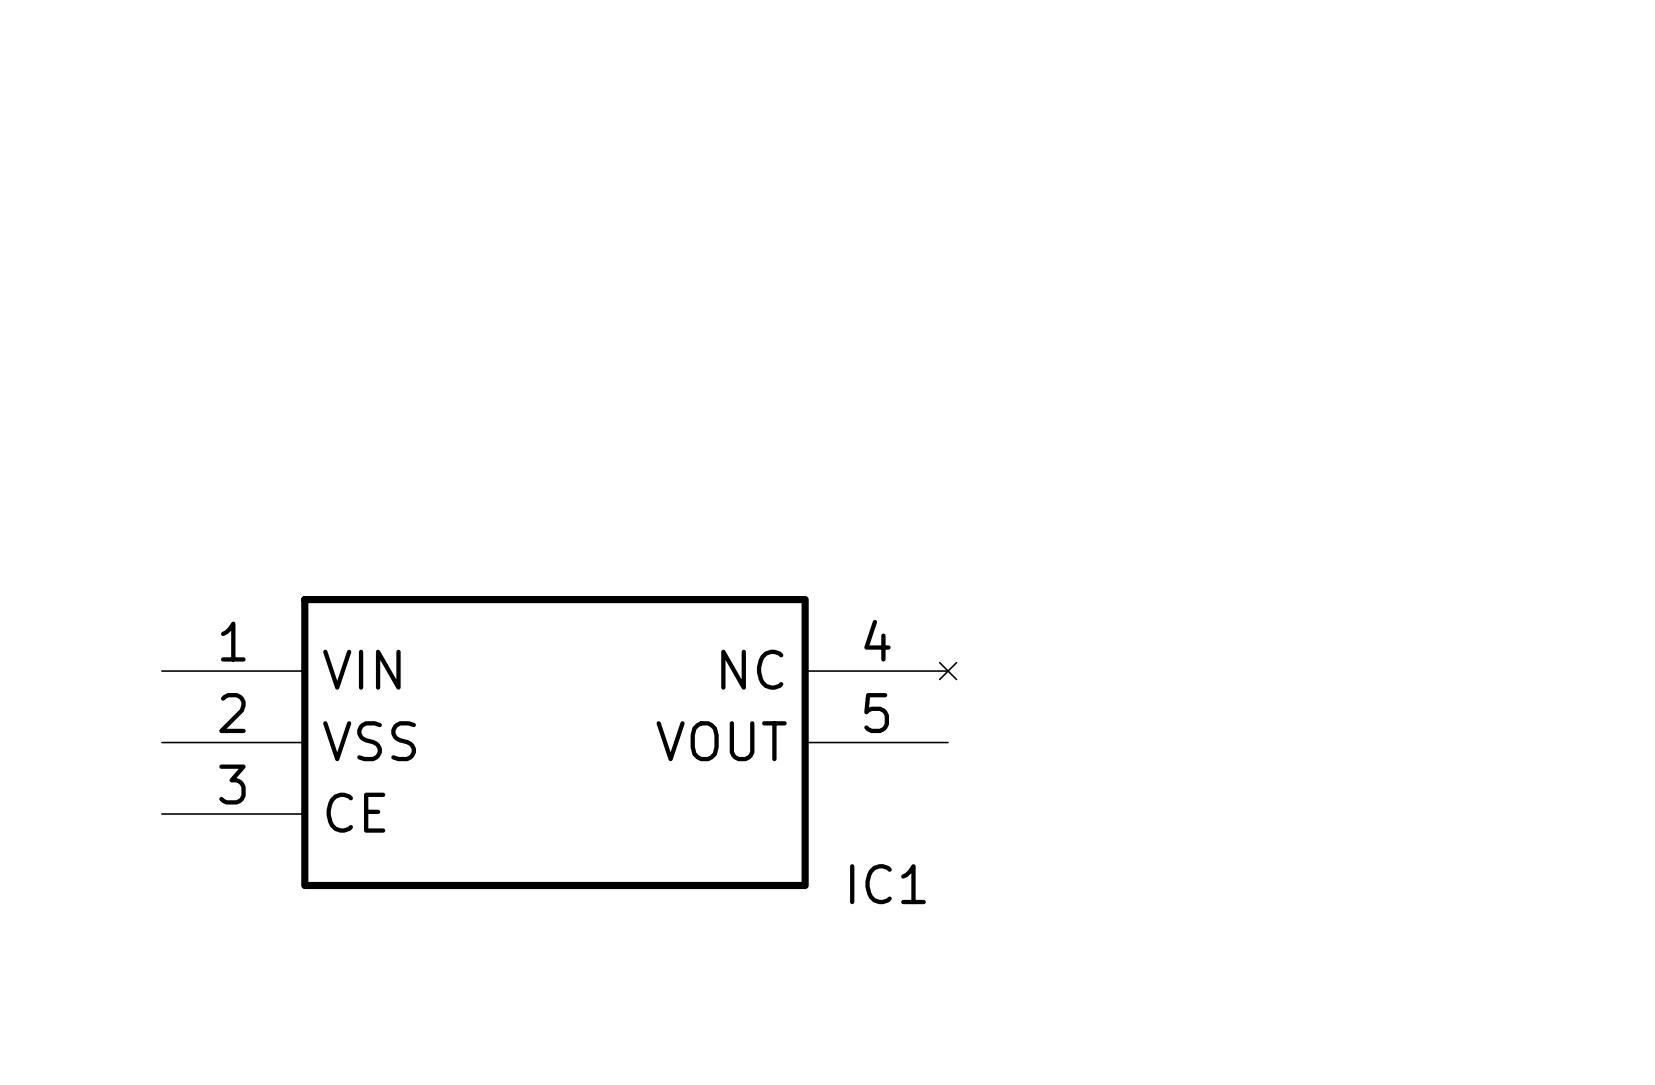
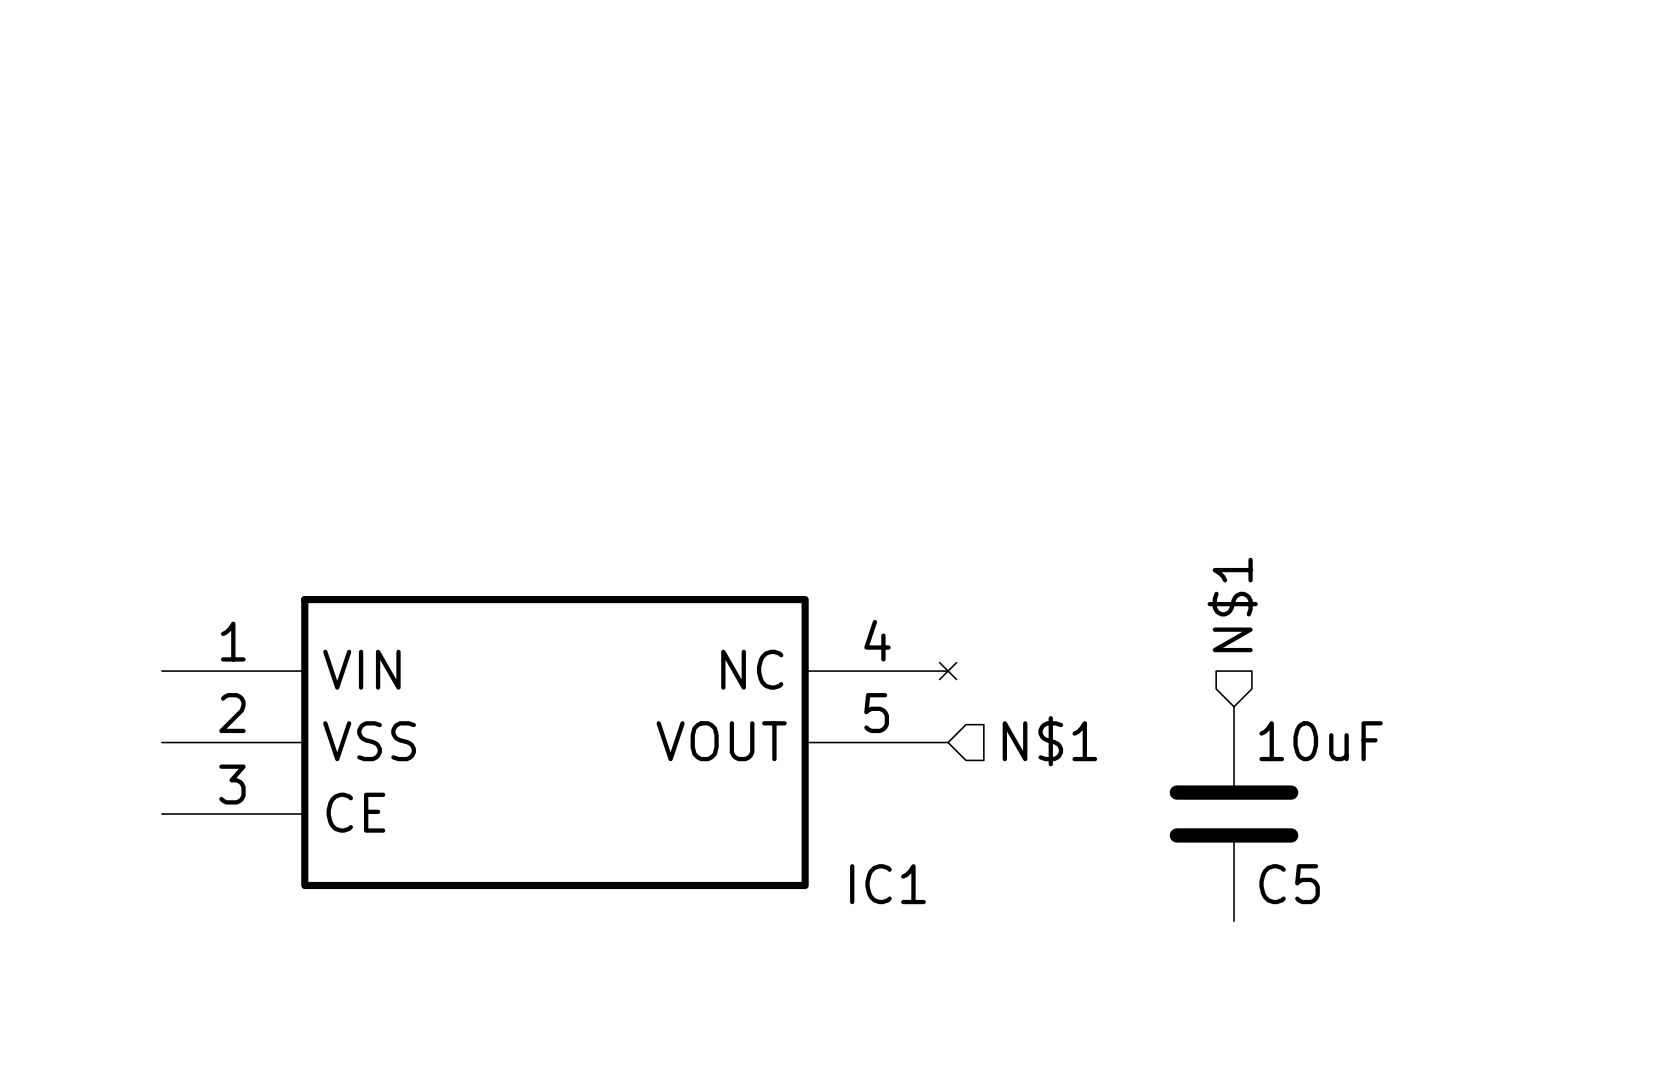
hierarchical label: none -> N$1 (1232, 604)
hierarchical label: none -> N$1 (1049, 741)
C5: none -> 10uF (1234, 814)

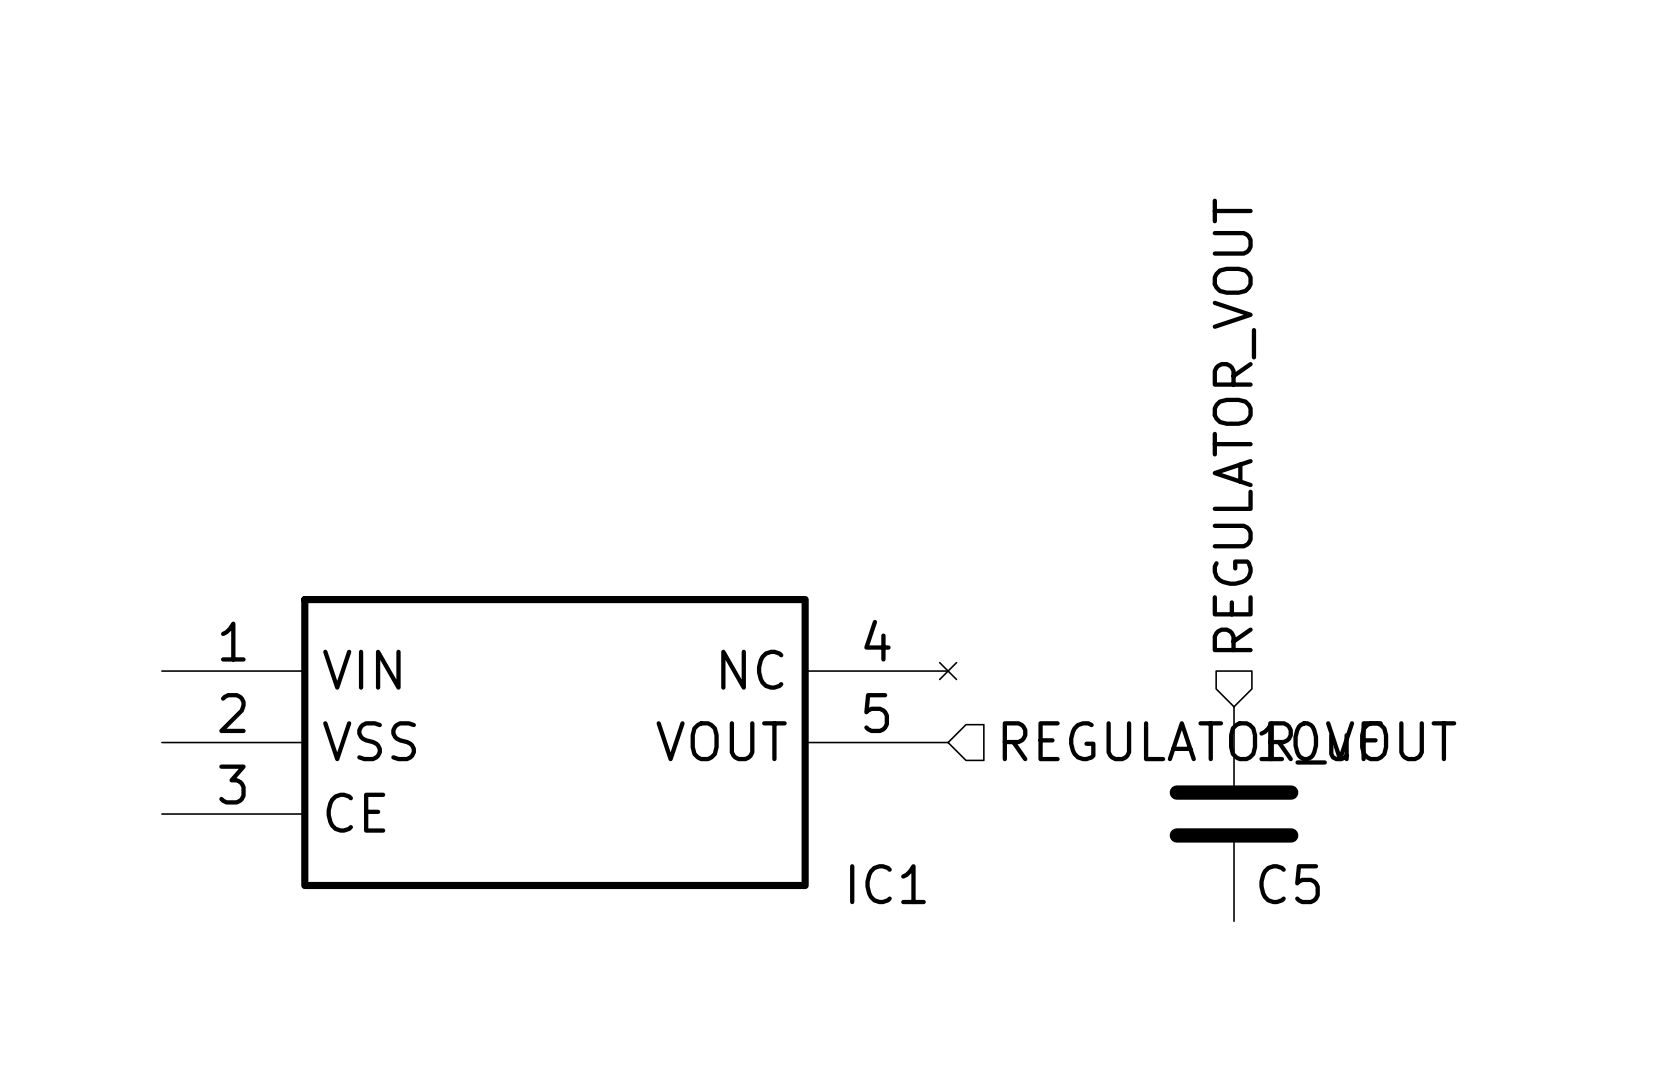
hierarchical label: N$1 (1232, 604) -> REGULATOR_VOUT (1234, 425)
hierarchical label: N$1 (1049, 741) -> REGULATOR_VOUT (1229, 742)

